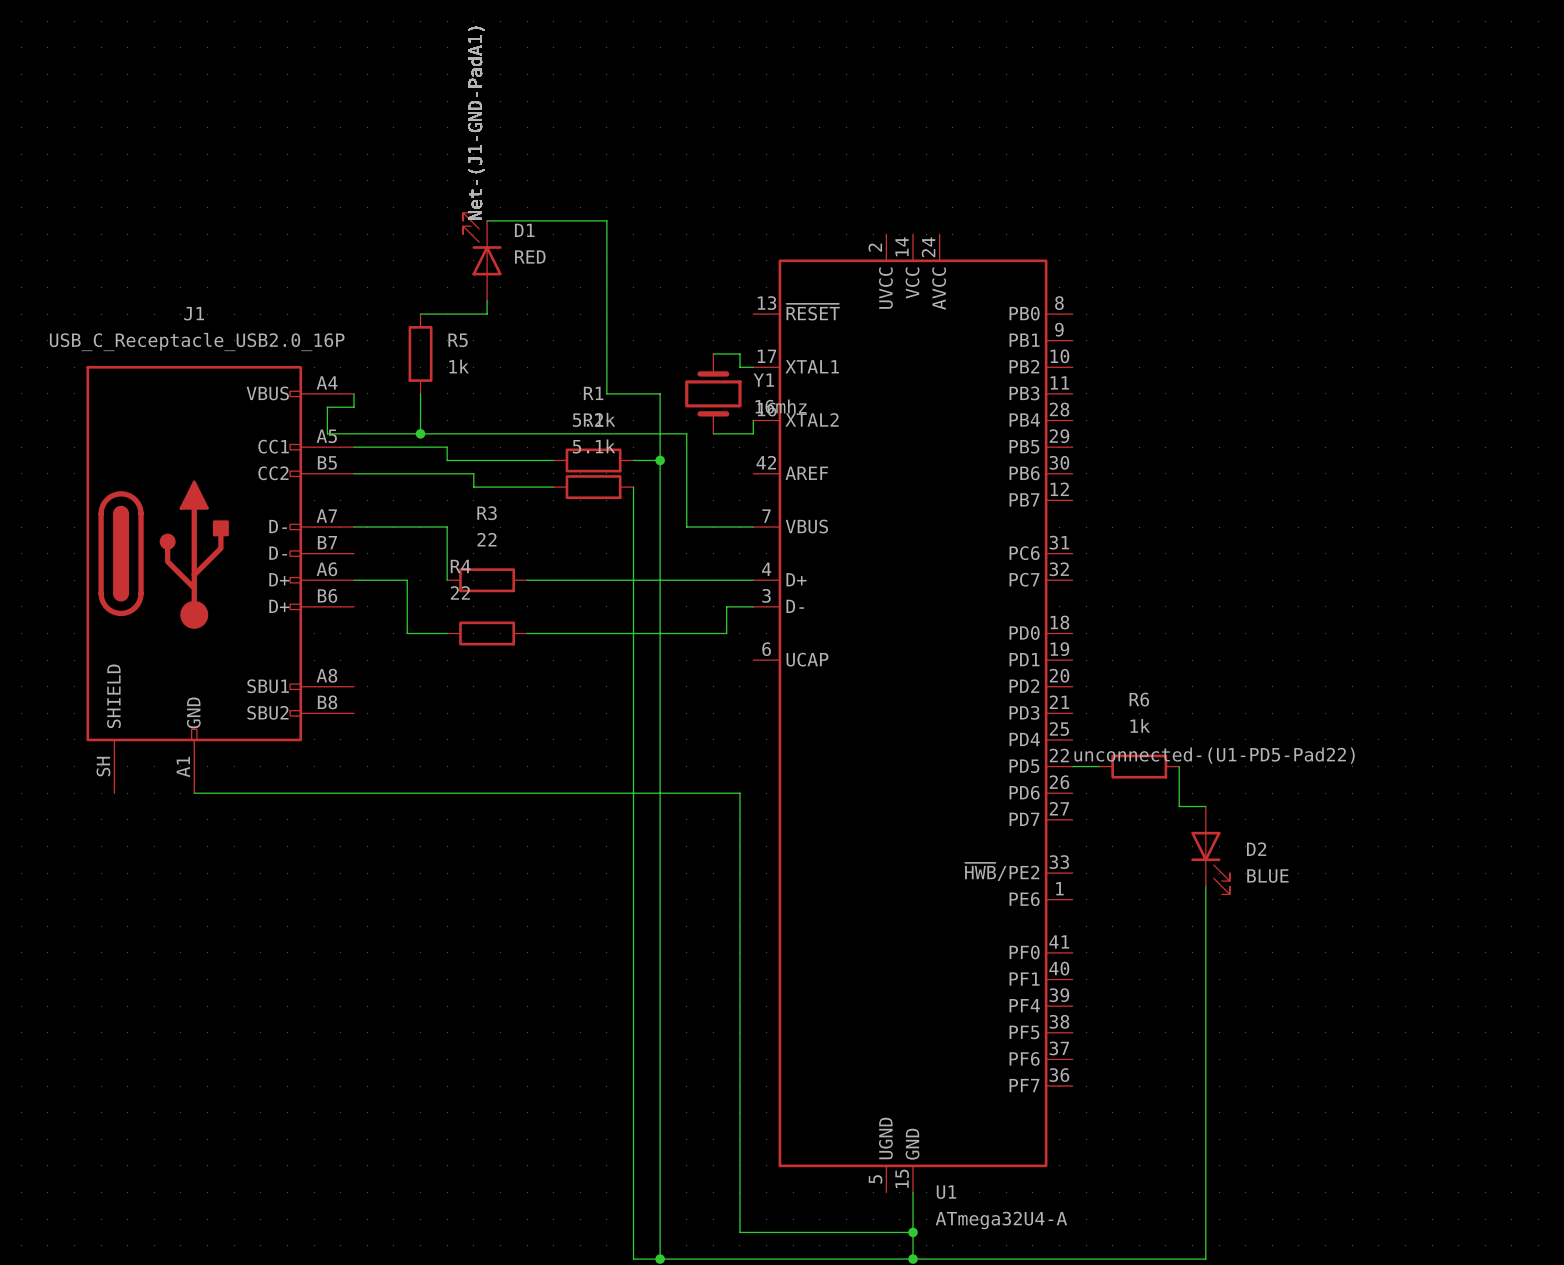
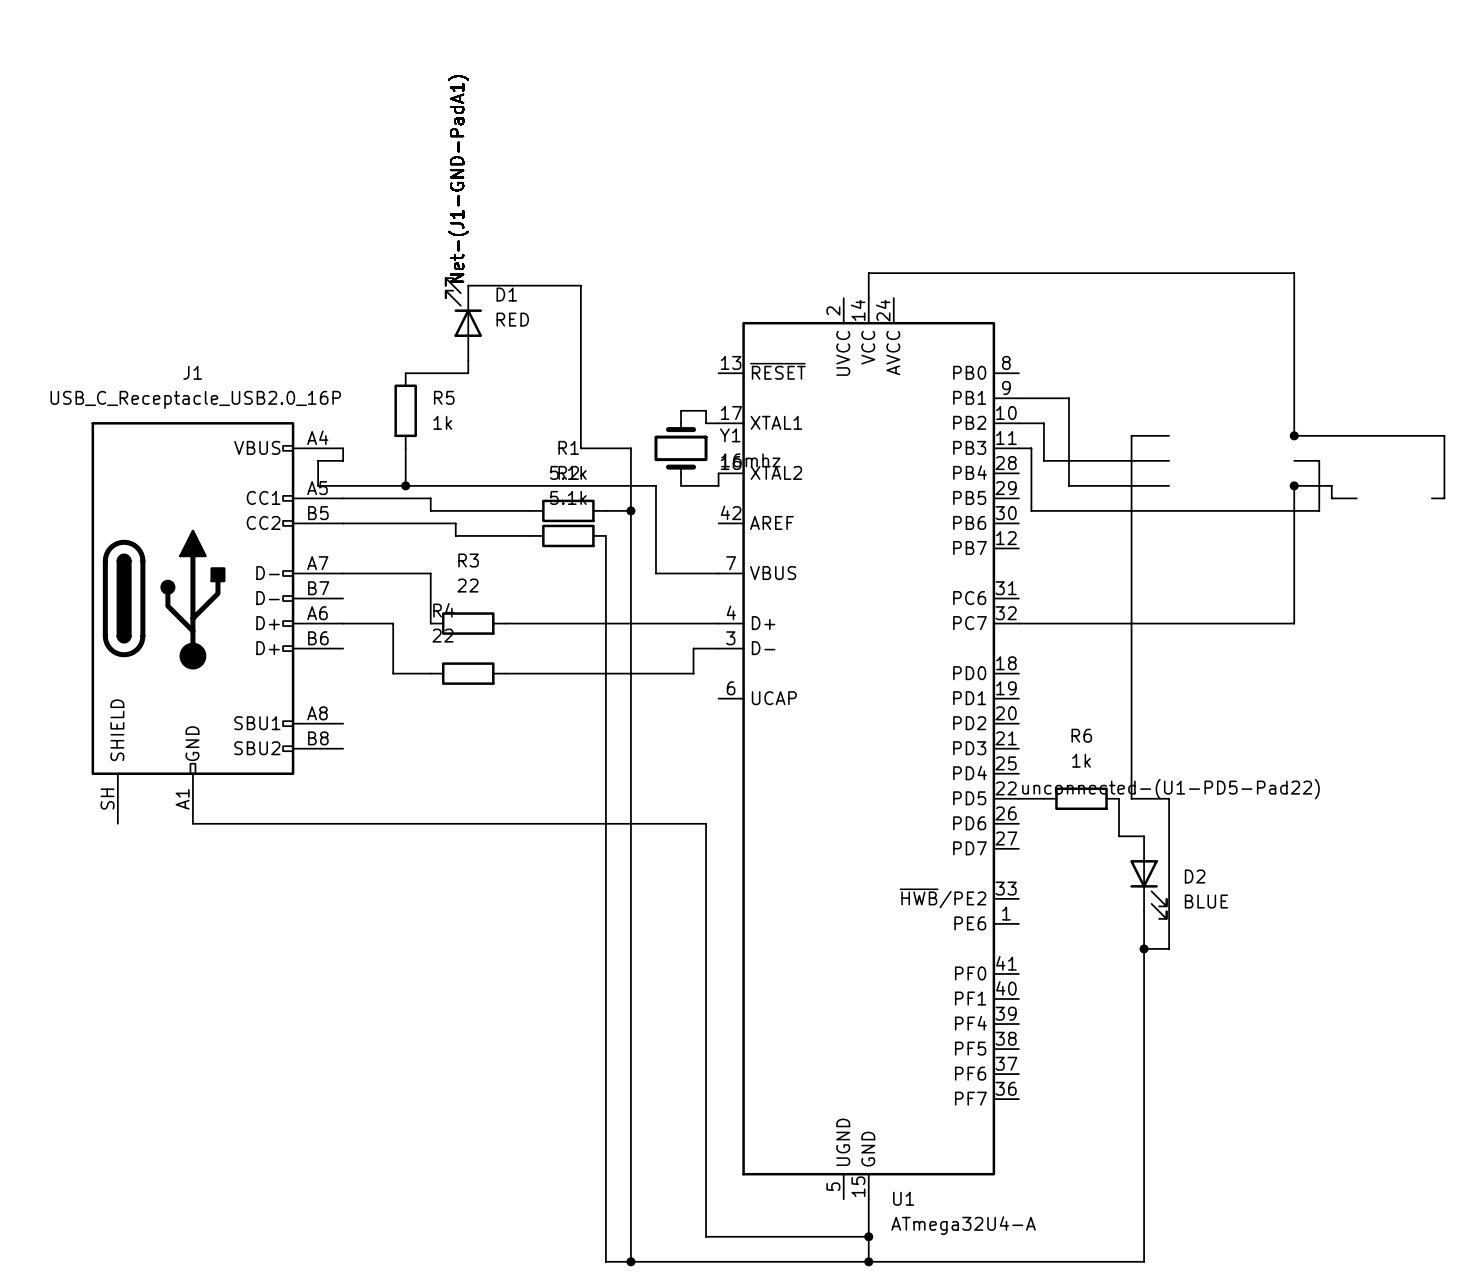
wire: none -> (868, 298) (868, 273) (1294, 273) (1294, 435) (1444, 435) (1444, 498) (1431, 498)
wire: none -> (1018, 398) (1068, 398) (1068, 485) (1169, 485)
wire: none -> (1018, 423) (1043, 423) (1043, 460) (1169, 460)
wire: none -> (1169, 435) (1131, 435) (1131, 798) (1169, 798) (1169, 948) (1144, 948)
junction: none -> (1294, 435)
wire: none -> (1018, 448) (1031, 448) (1031, 510) (1319, 510) (1319, 460) (1294, 460)
junction: none -> (1294, 485)
wire: none -> (1356, 498) (1331, 498) (1331, 485) (1294, 485) (1294, 623) (1018, 623)
junction: none -> (1144, 948)

